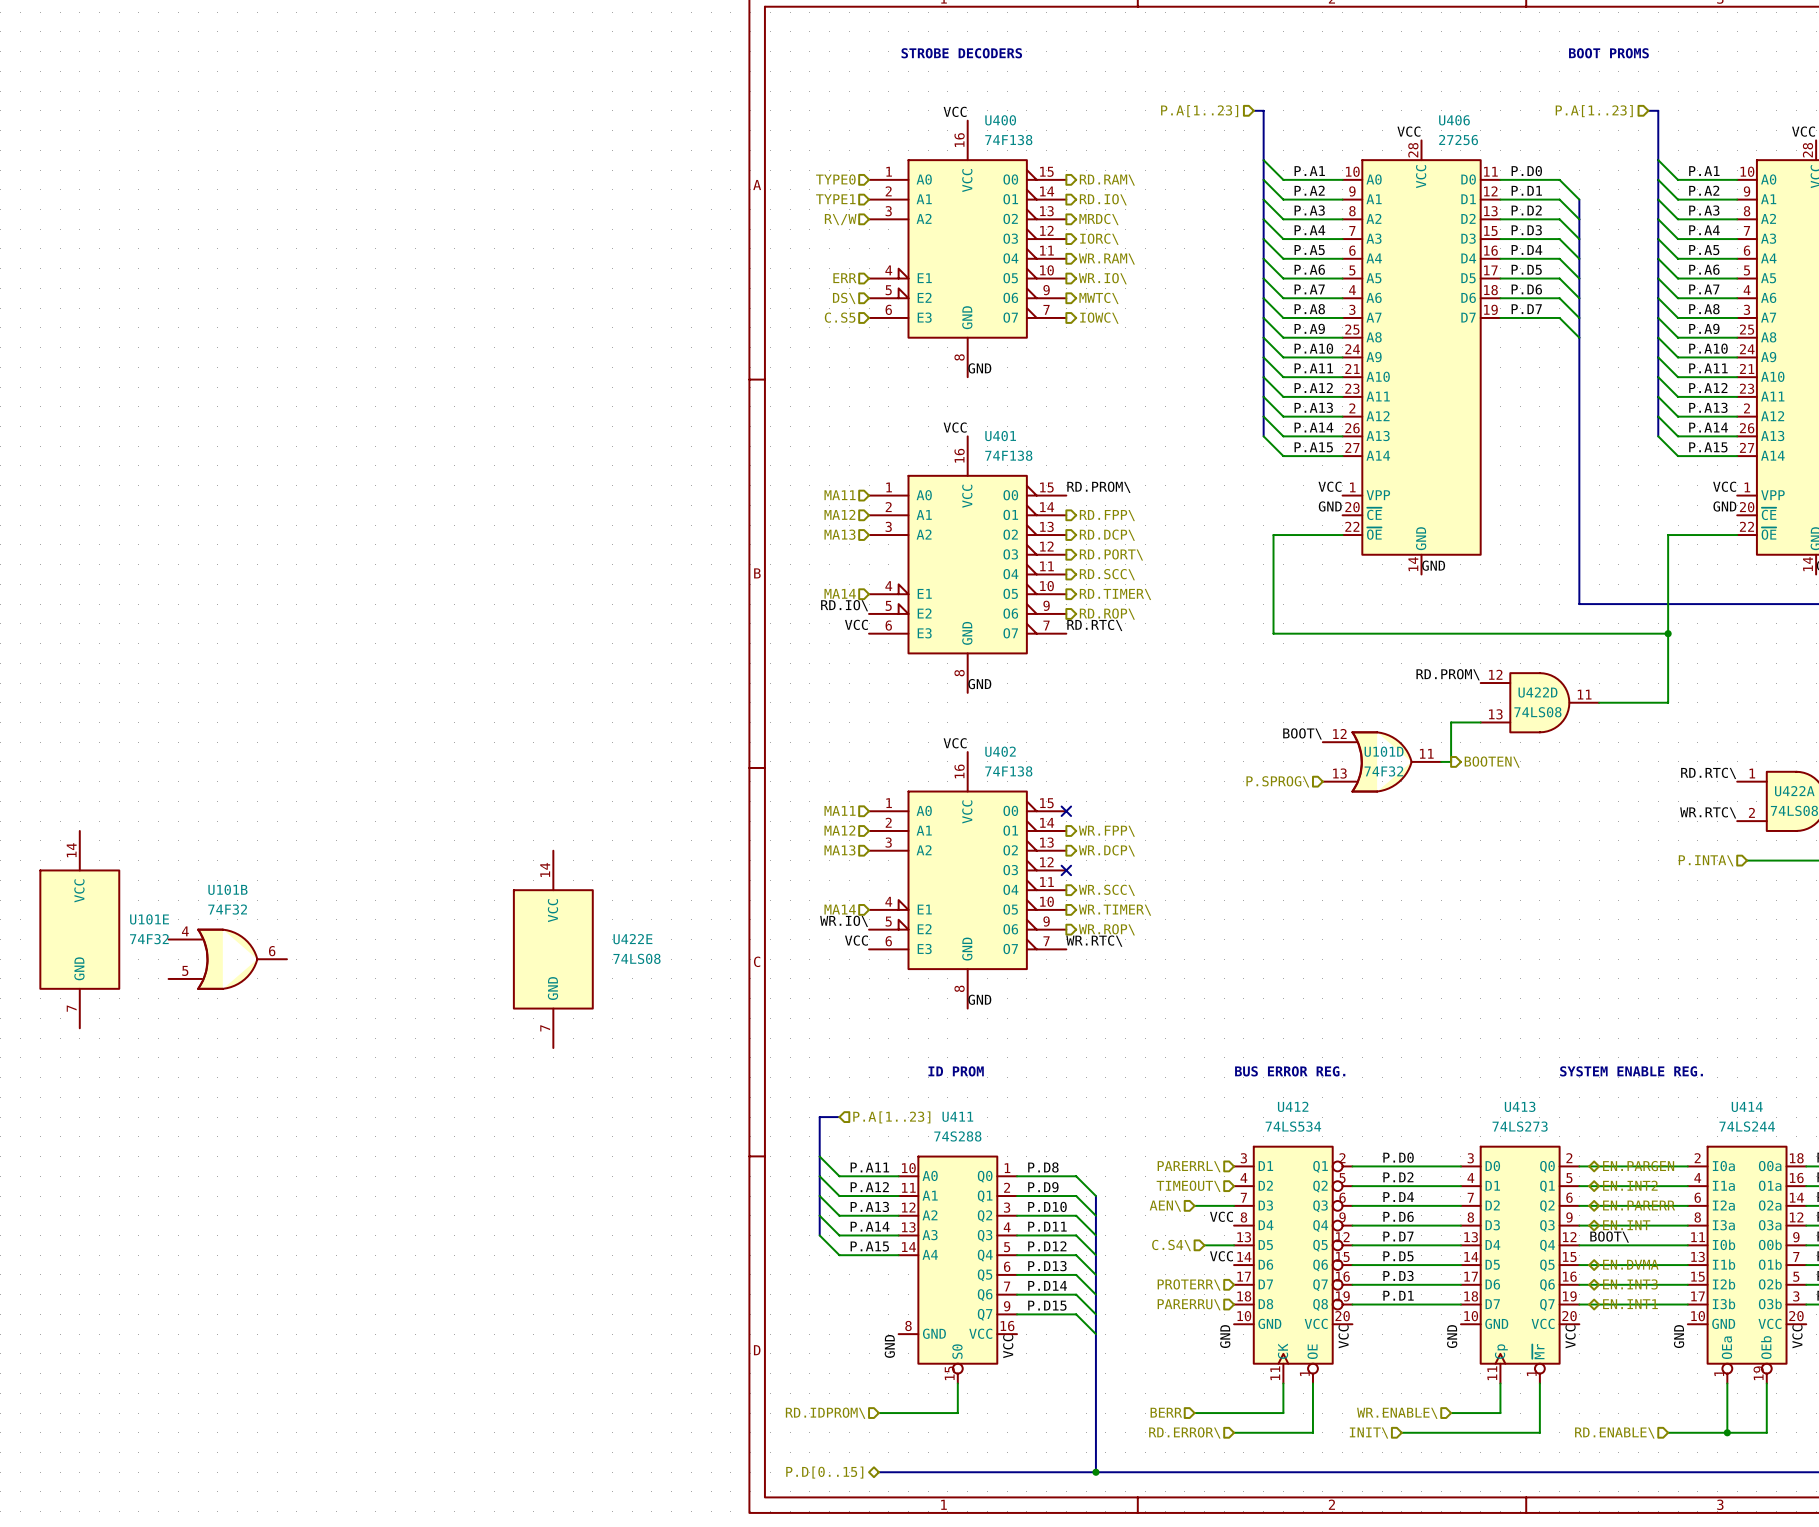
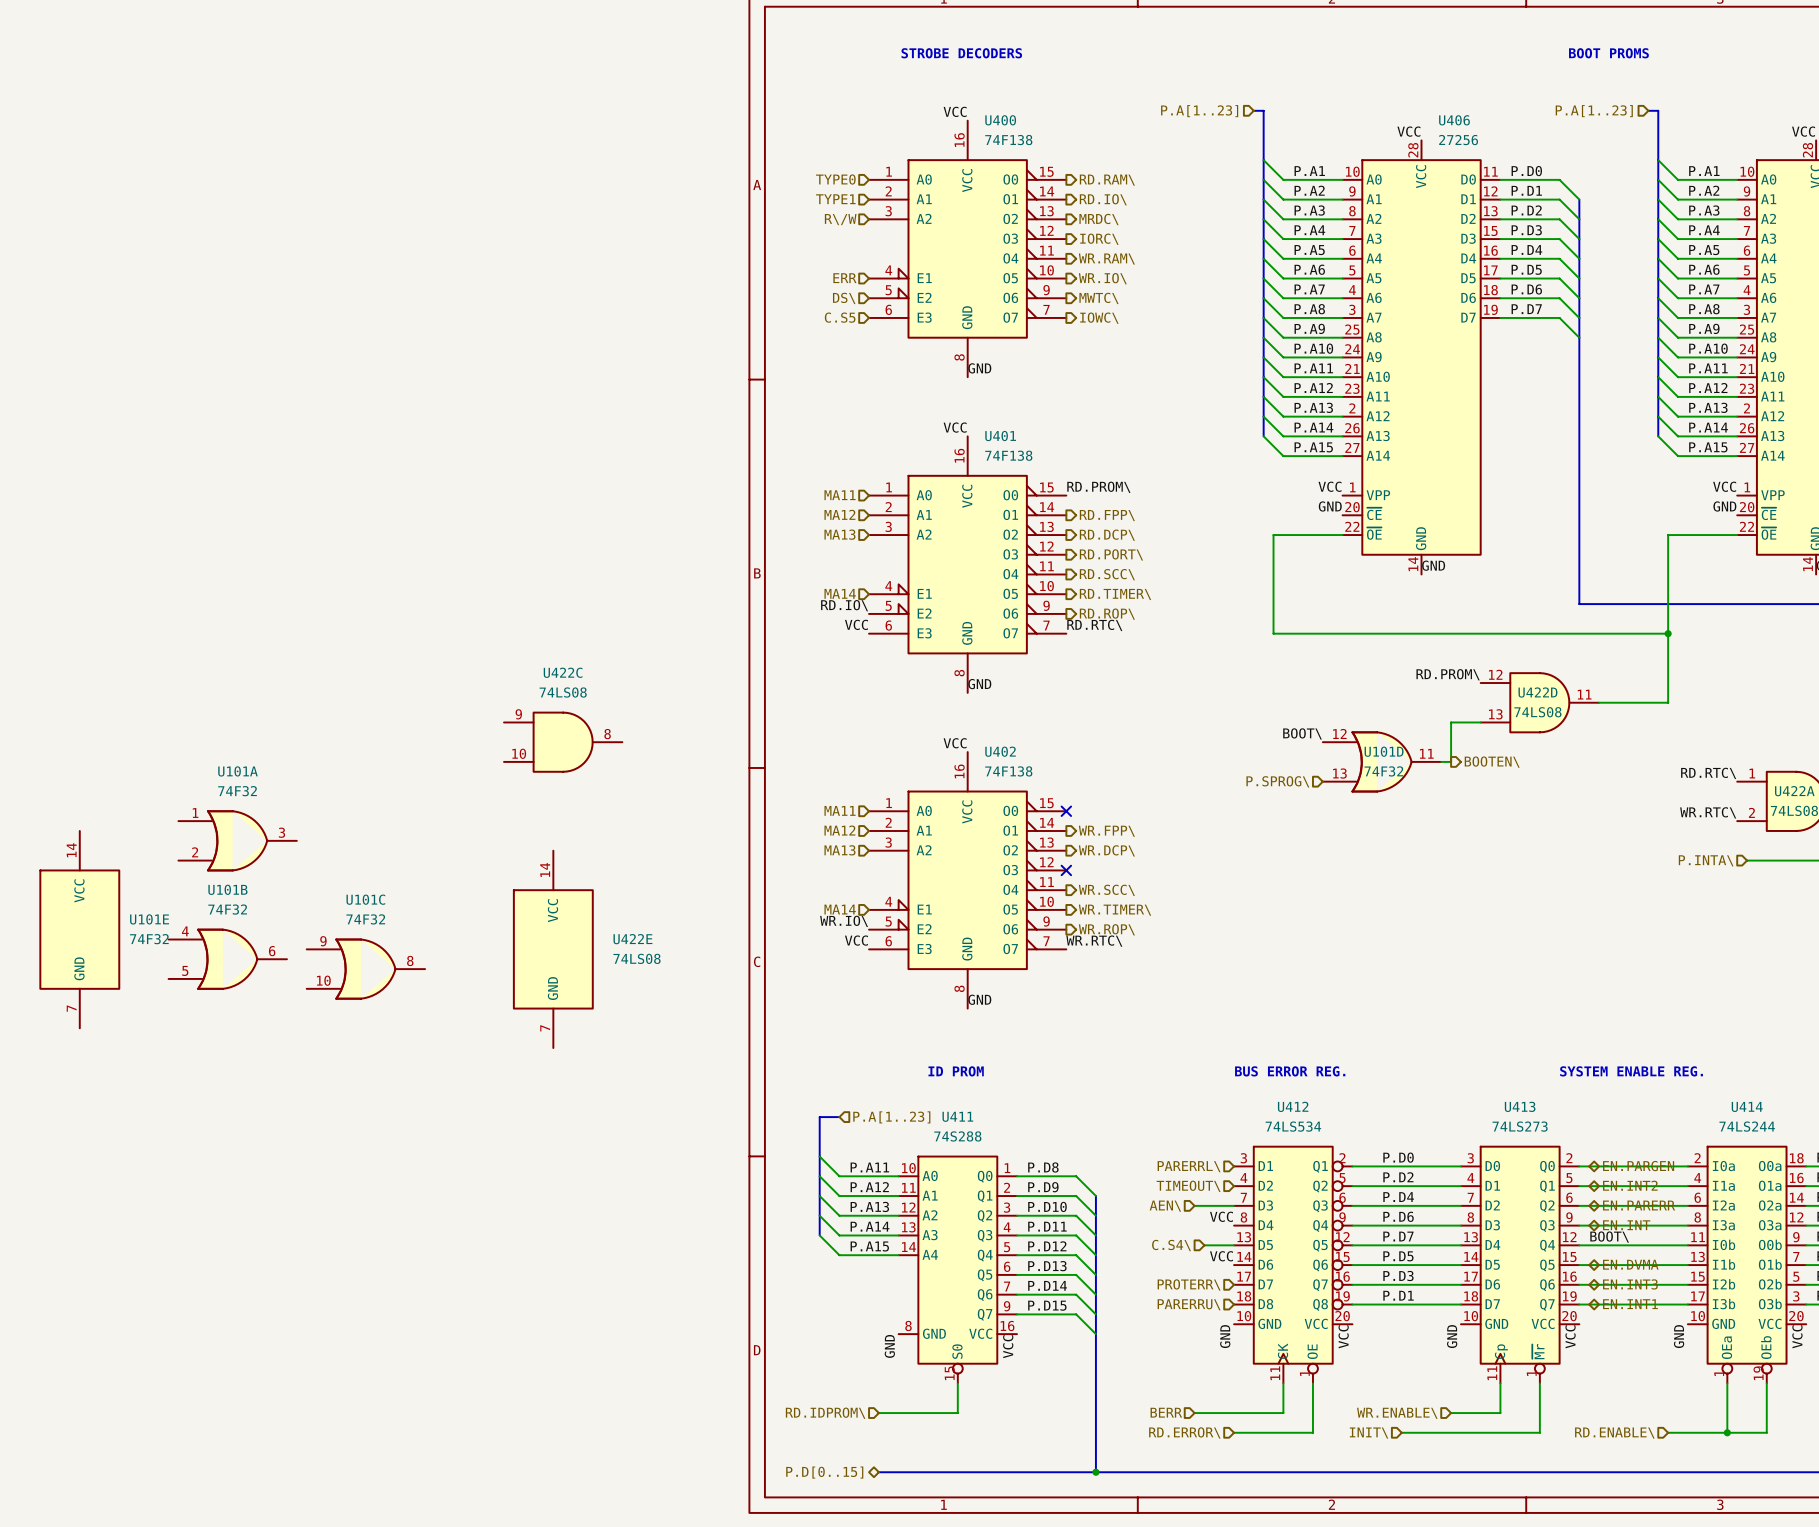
U422C: none -> 74LS08 (563, 742)
U101A: none -> 74F32 (237, 840)
U101C: none -> 74F32 (365, 969)

